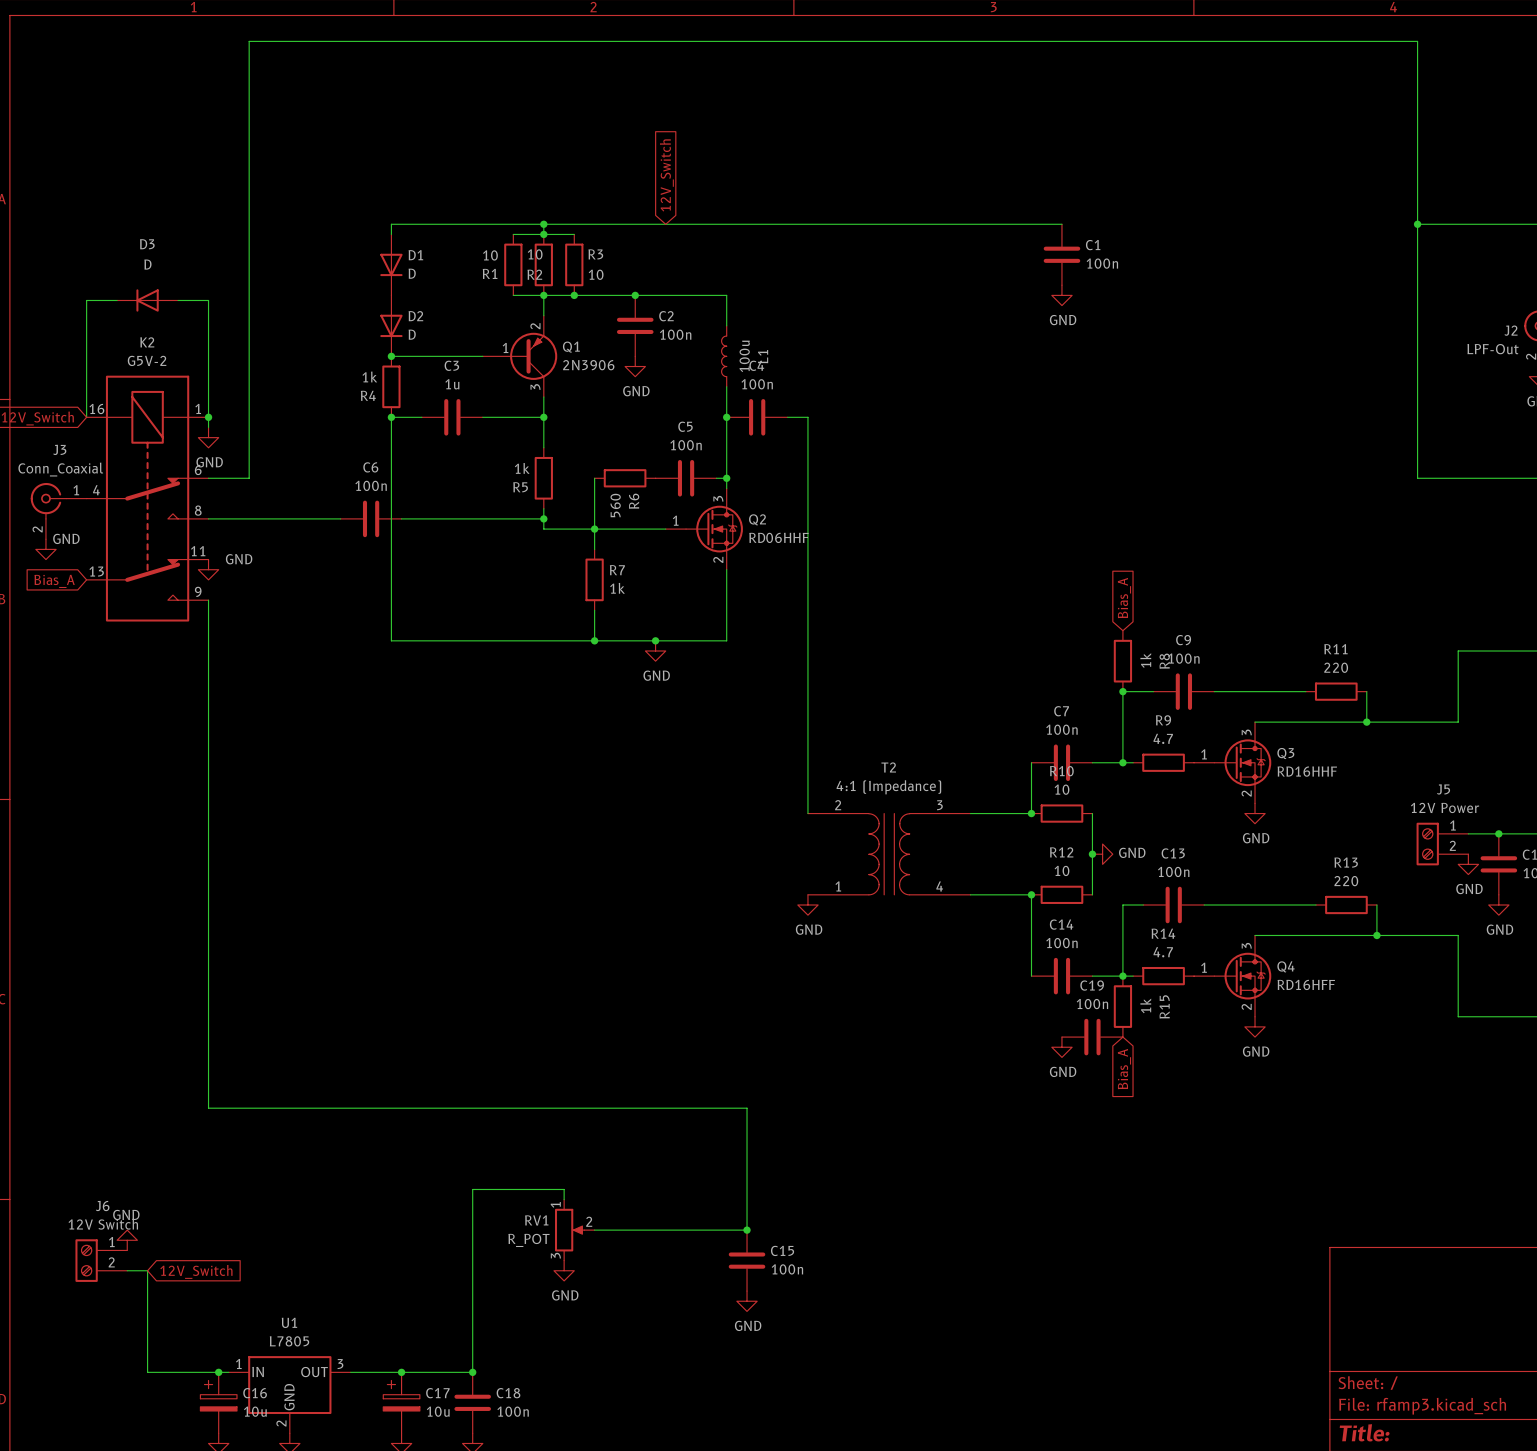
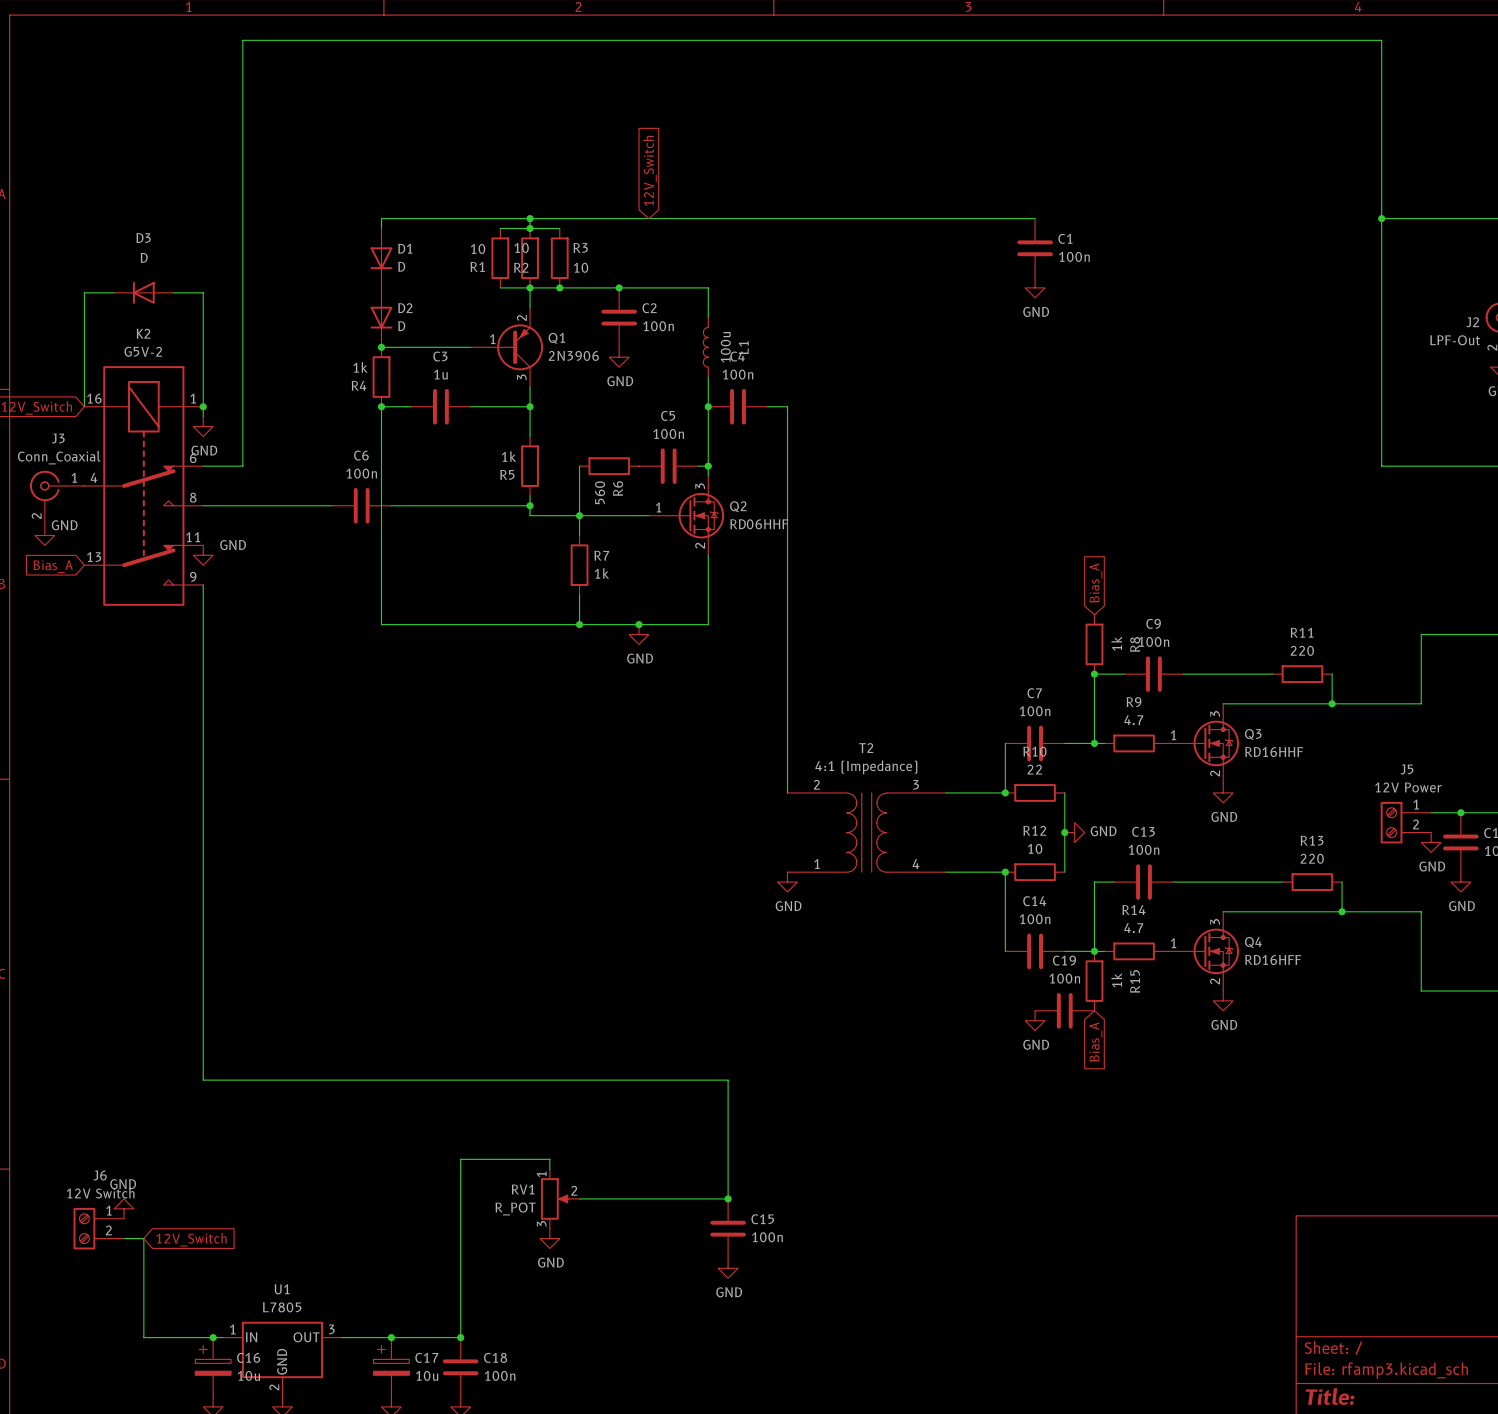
R10 value: 10 (1061, 789) -> 22 (1034, 769)

